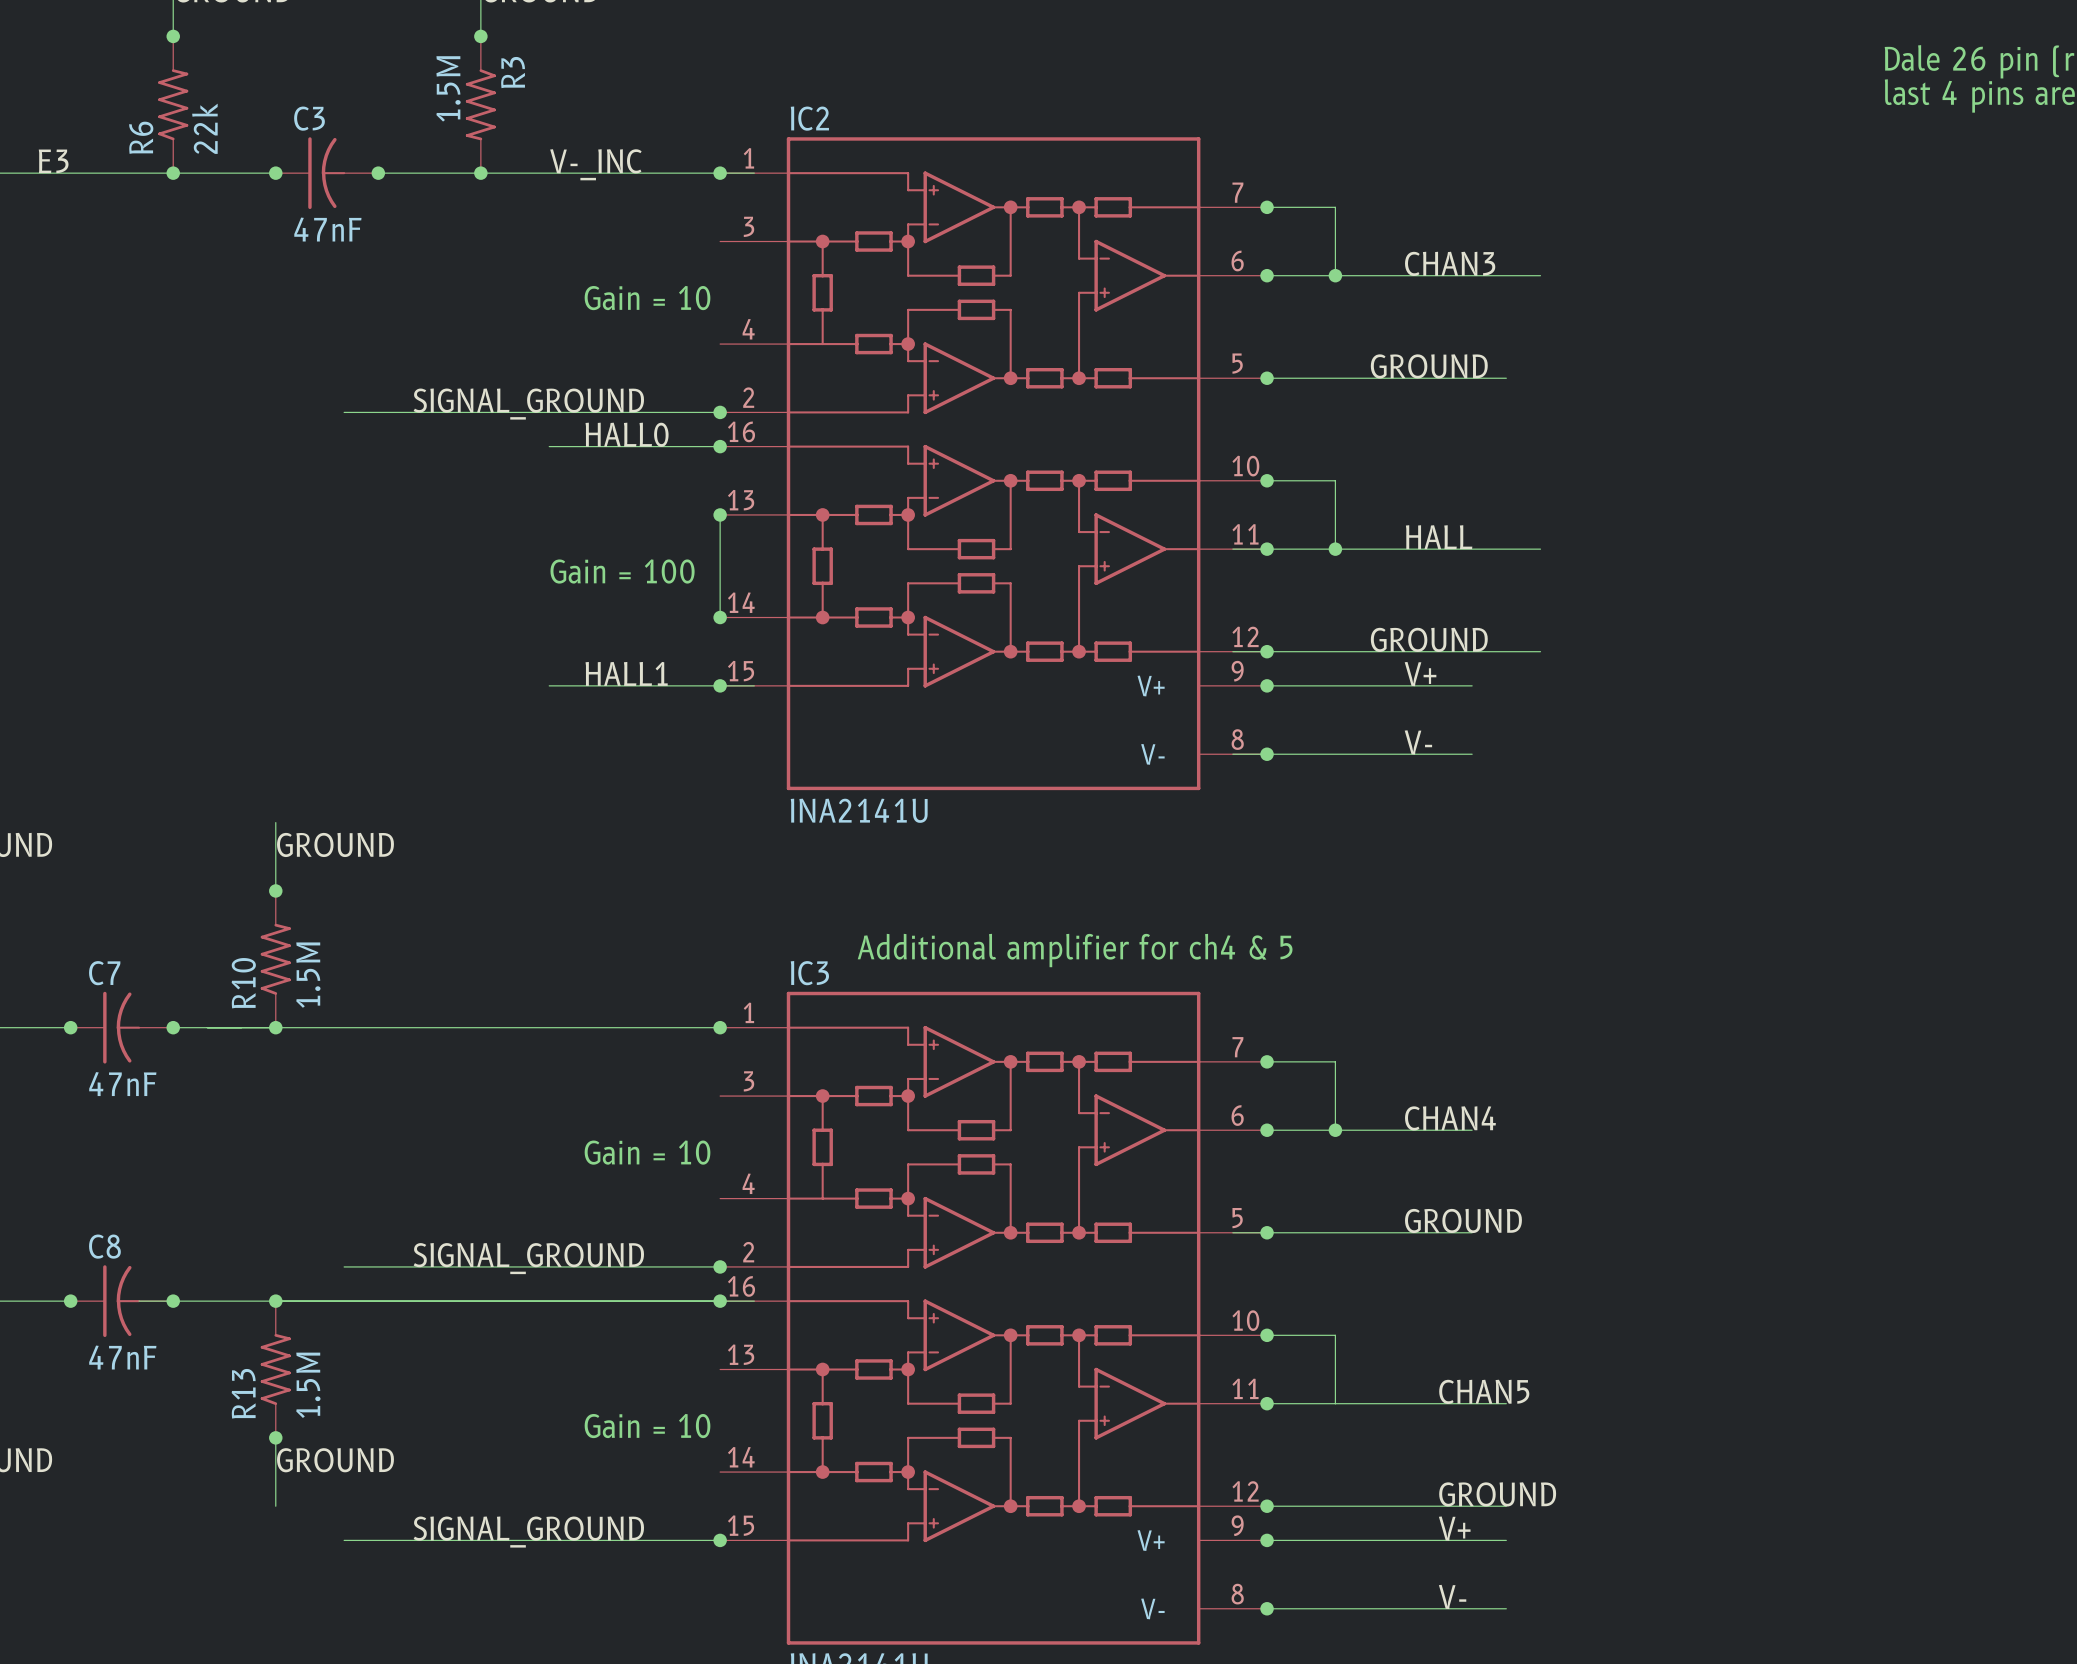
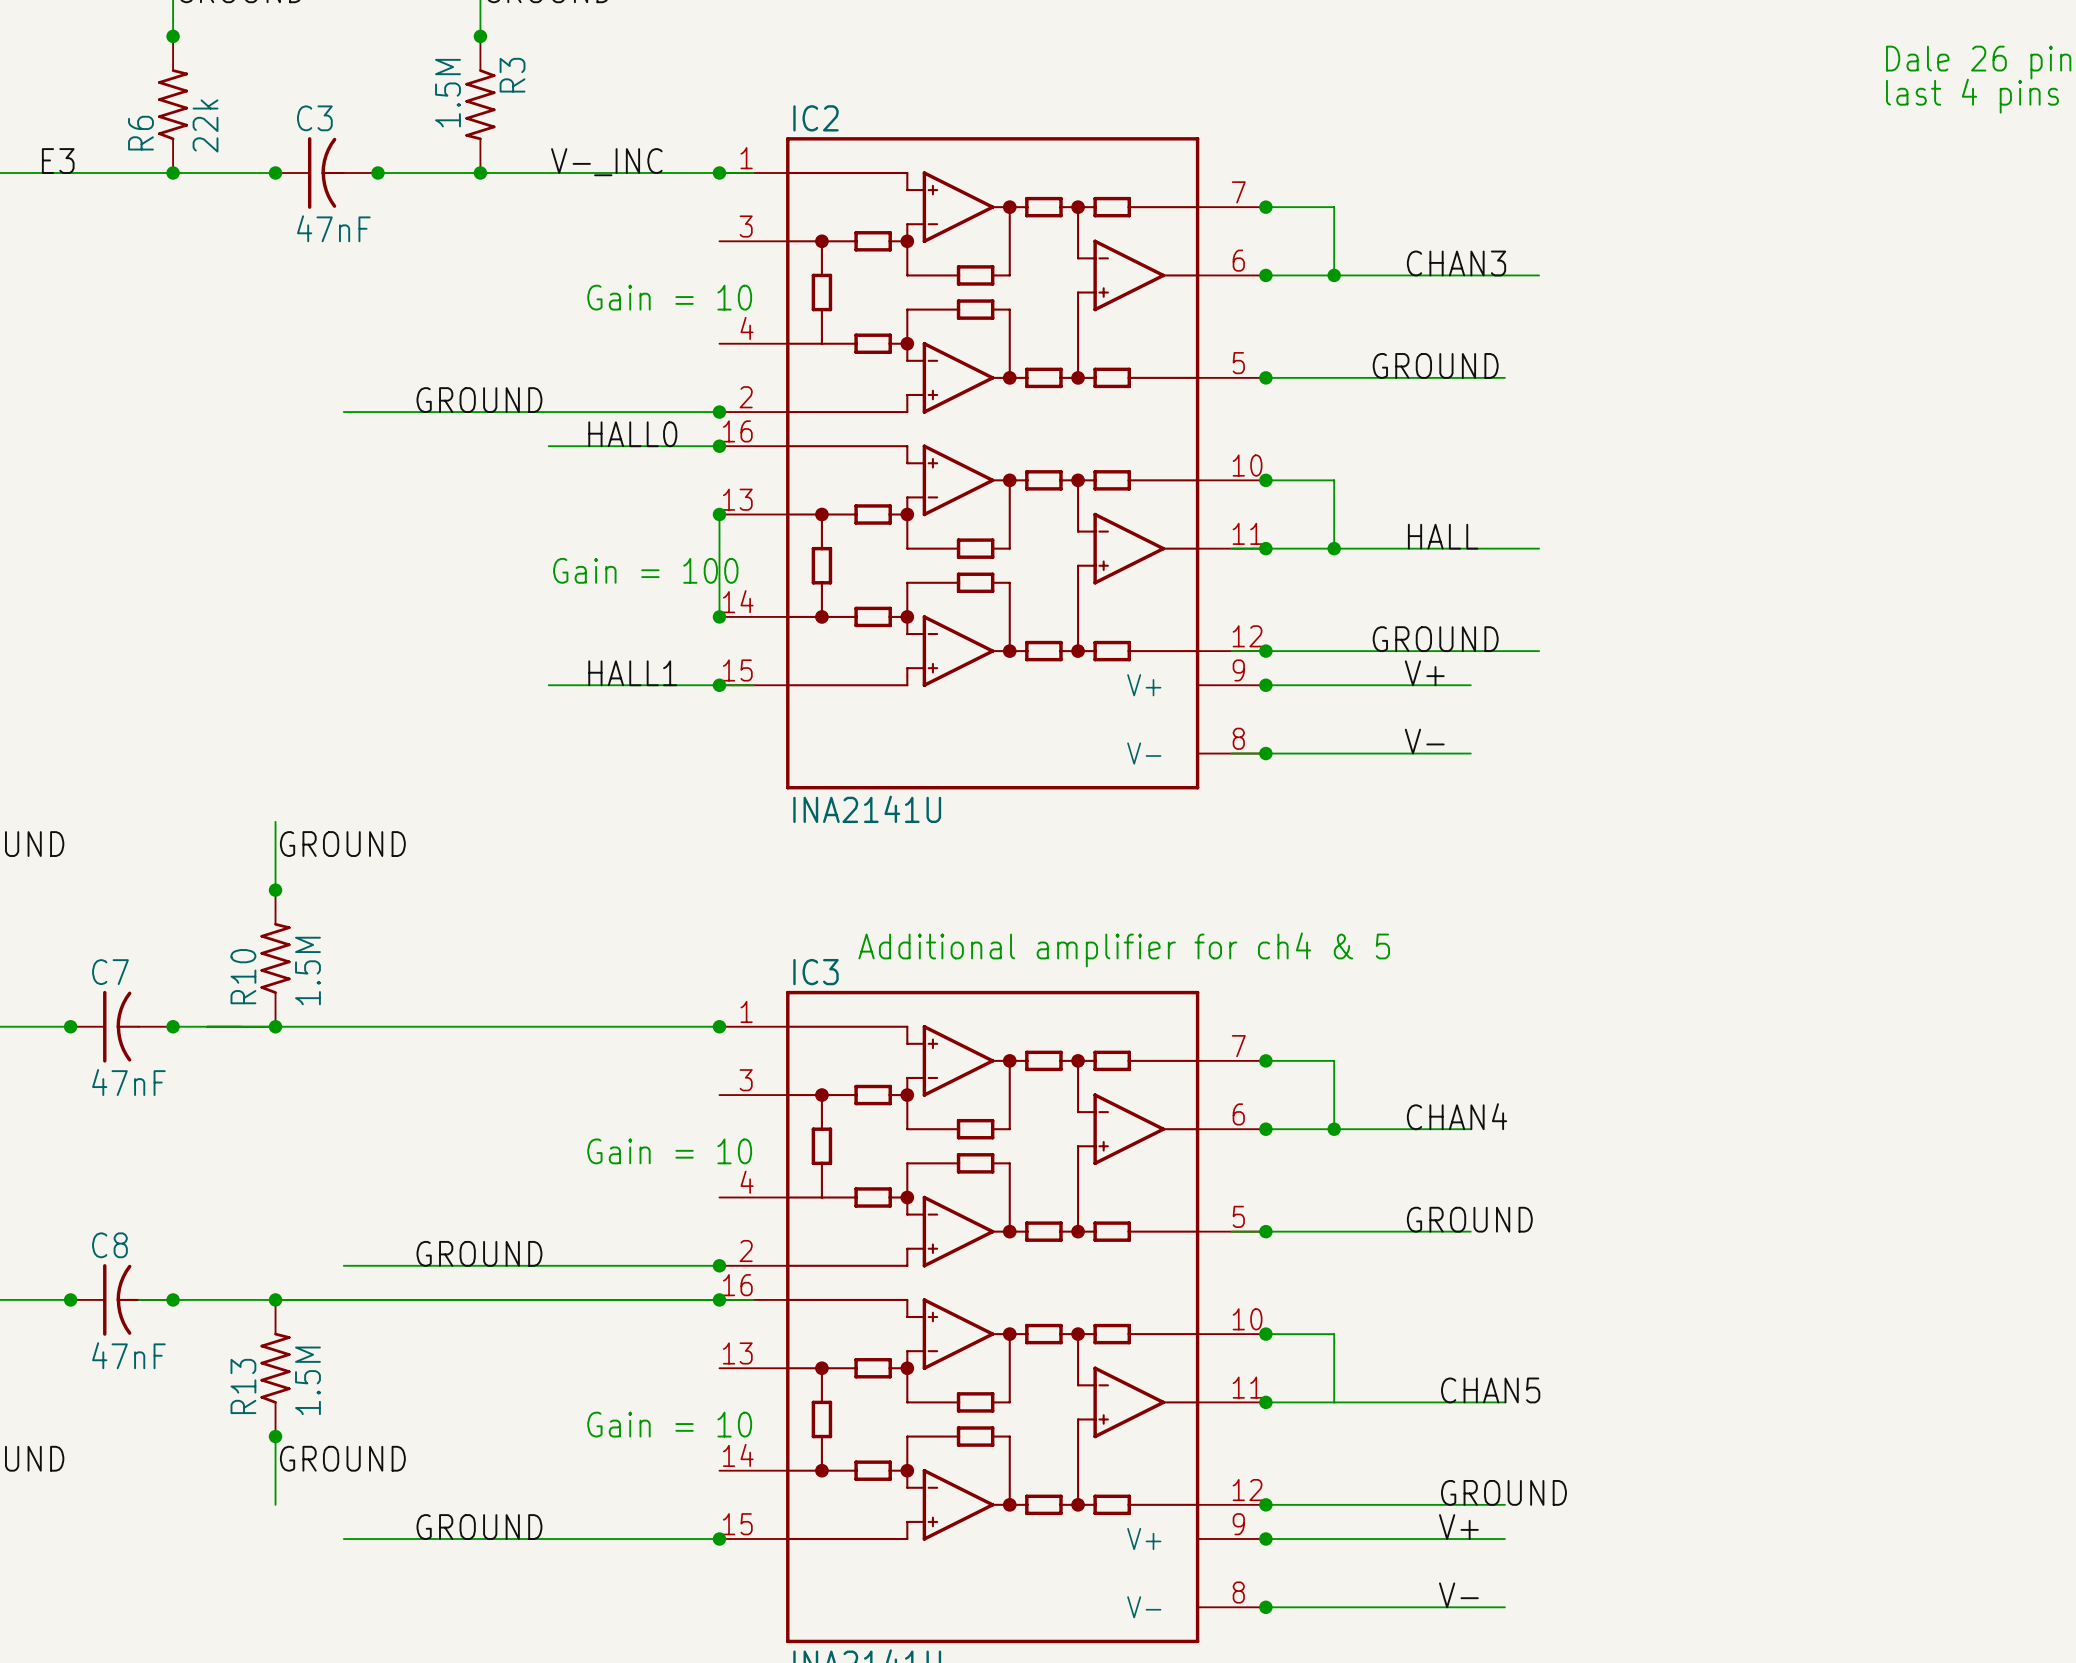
label: SIGNAL_GROUND (528, 404) -> GROUND (479, 400)
label: SIGNAL_GROUND (528, 1258) -> GROUND (479, 1253)
label: SIGNAL_GROUND (528, 1532) -> GROUND (479, 1527)

